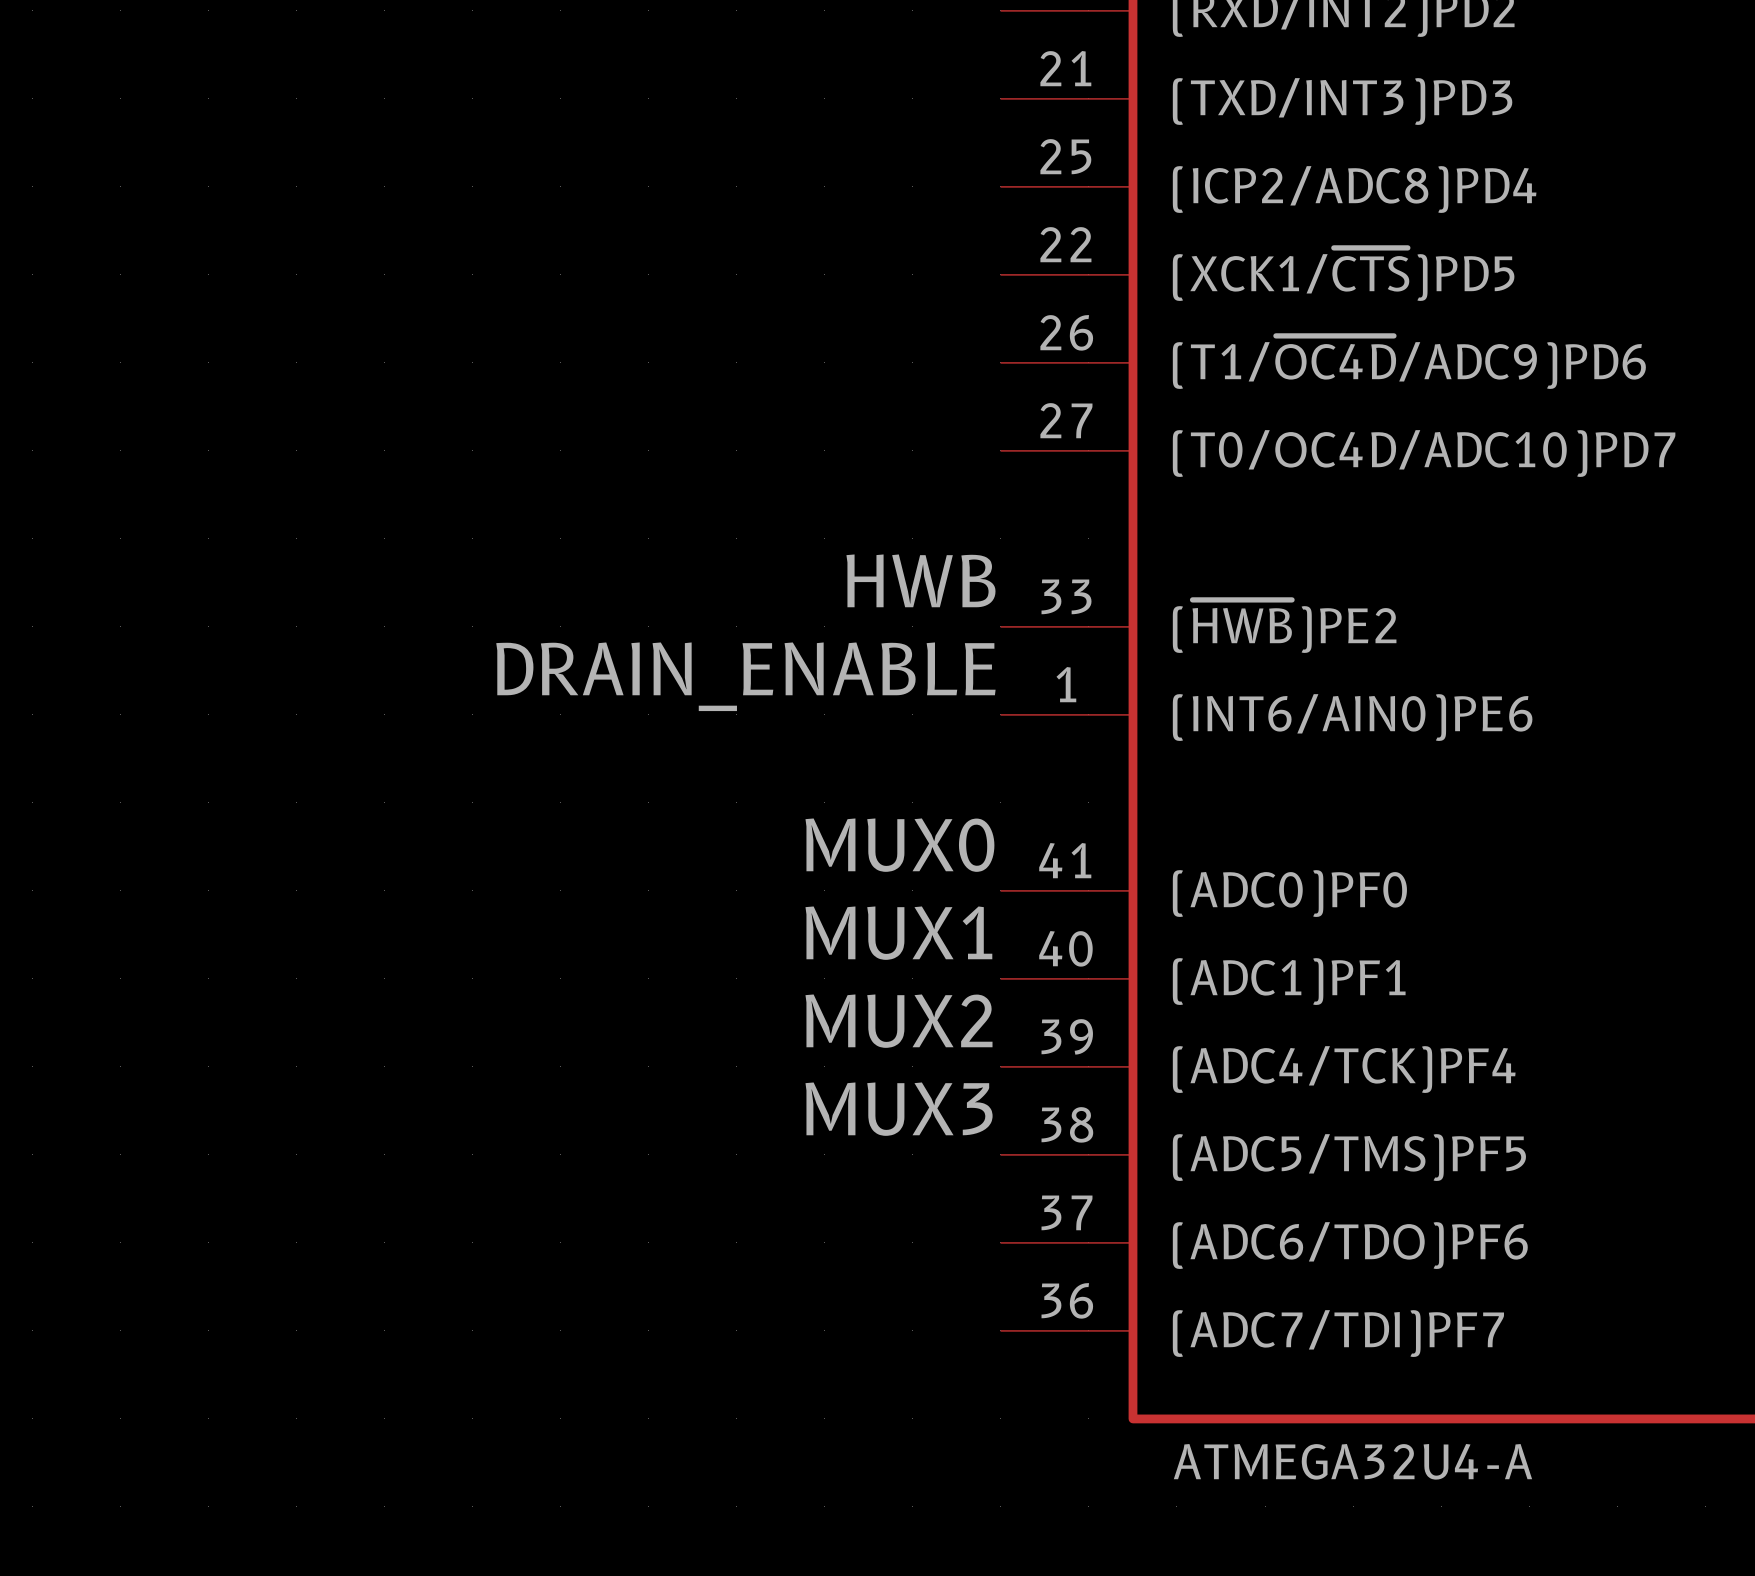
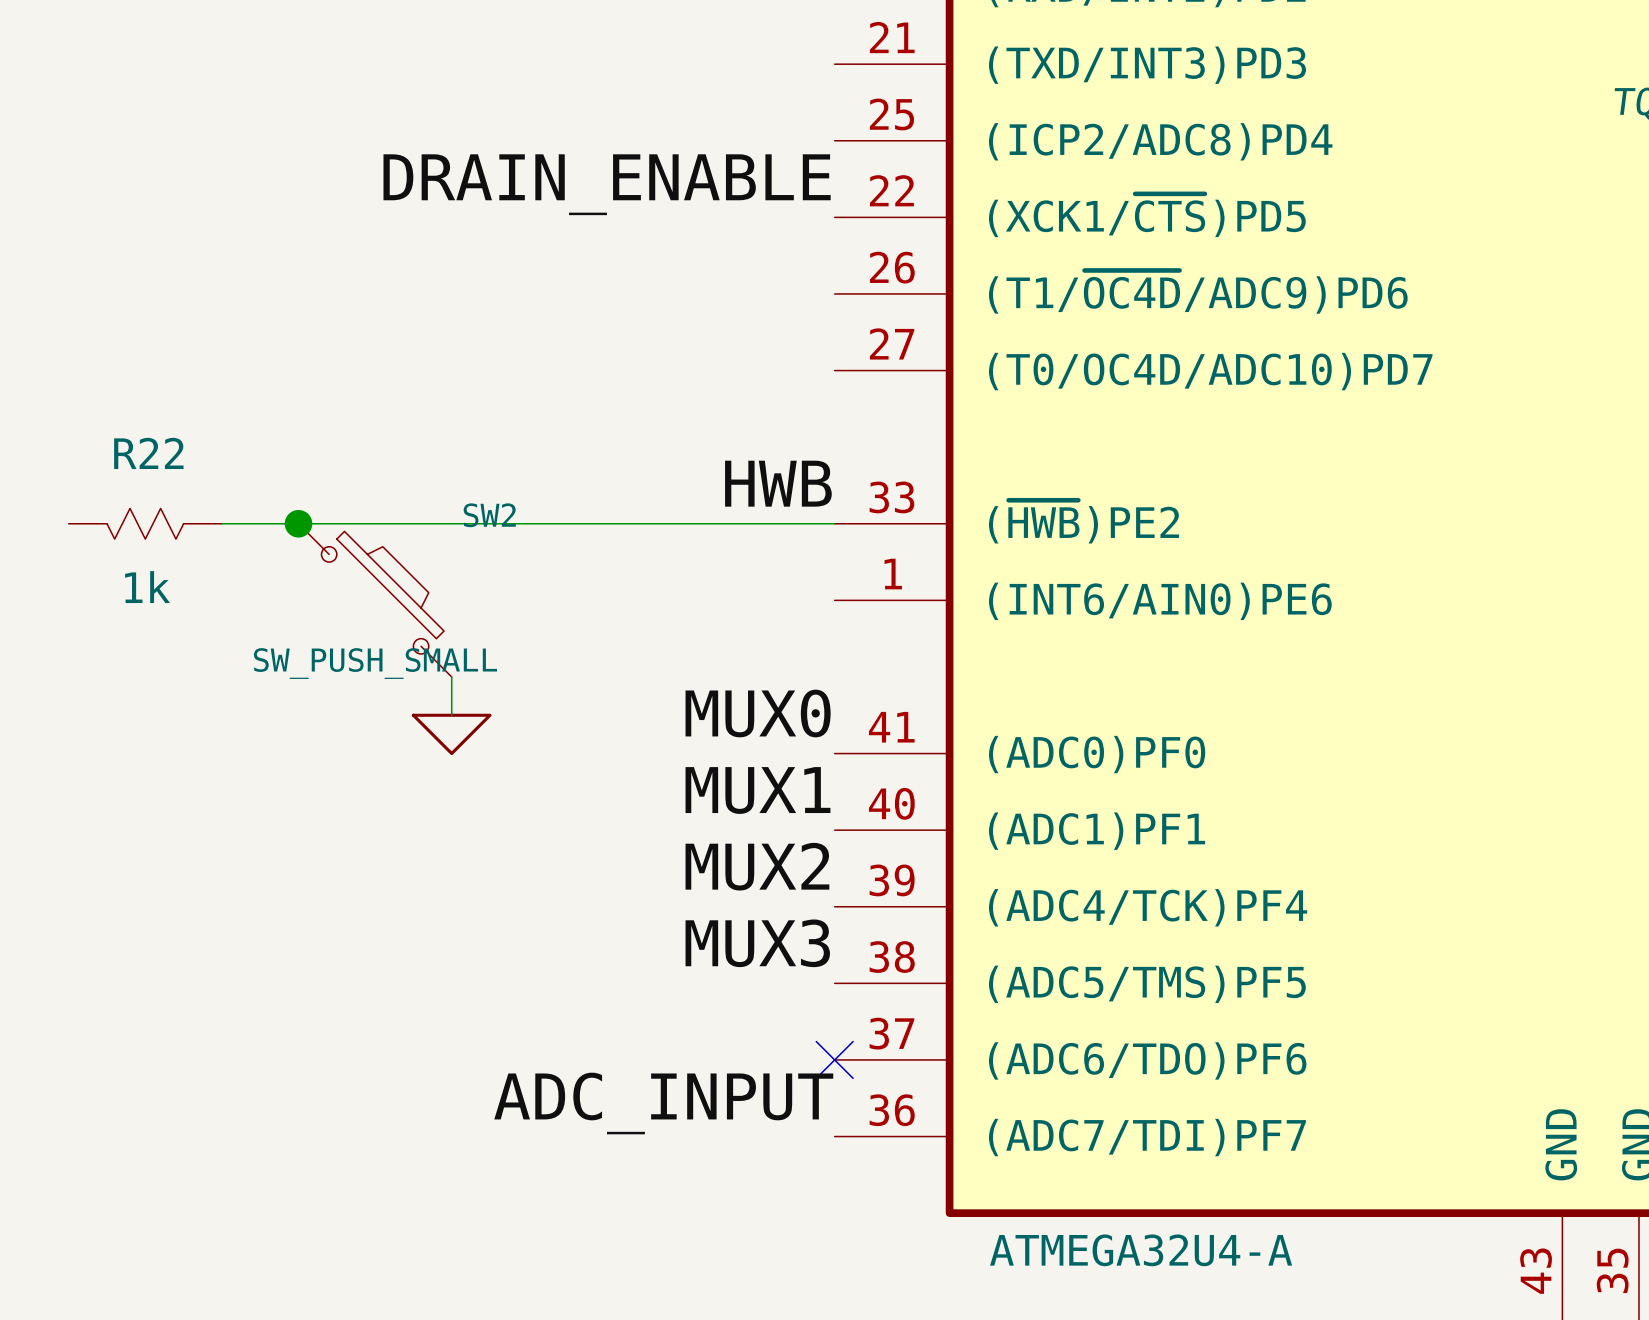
R22: none -> 1k (145, 523)
wire: none -> (221, 523) (834, 523)
junction: none -> (298, 523)
label position: DRAIN_ENABLE (745, 676) -> DRAIN_ENABLE (607, 184)
SW2: none -> SW_PUSH_SMALL (375, 600)
wire: none -> (451, 676) (451, 715)
power symbol: none -> (451, 734)
no-connect mark: none -> (834, 1059)
label: none -> ADC_INPUT (663, 1103)

